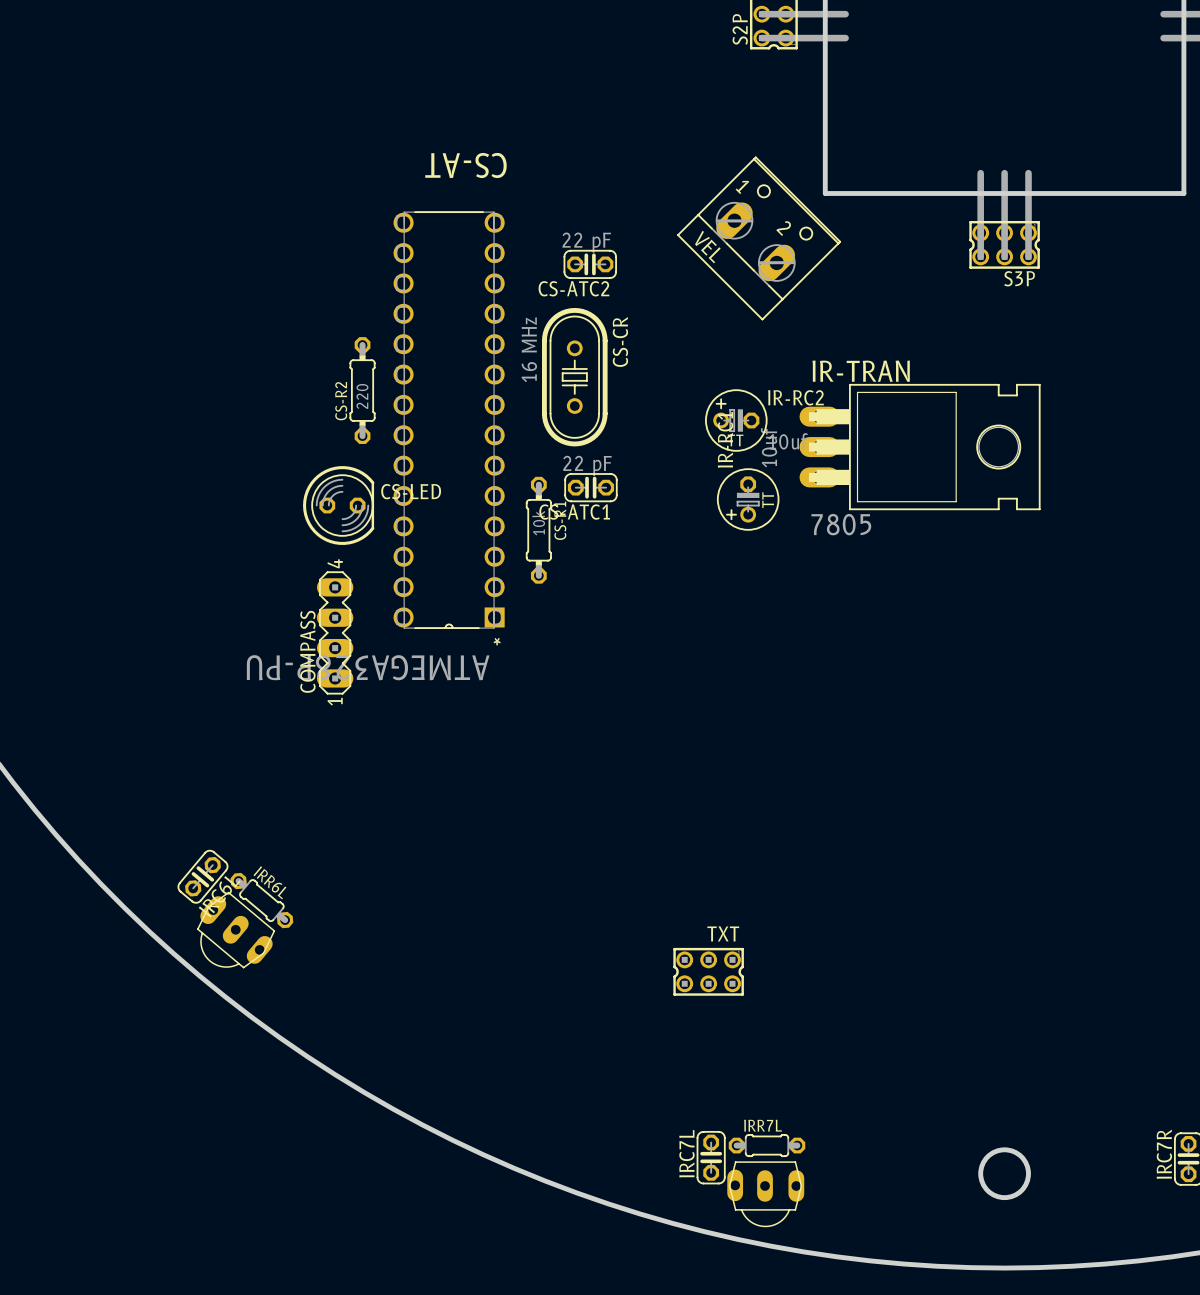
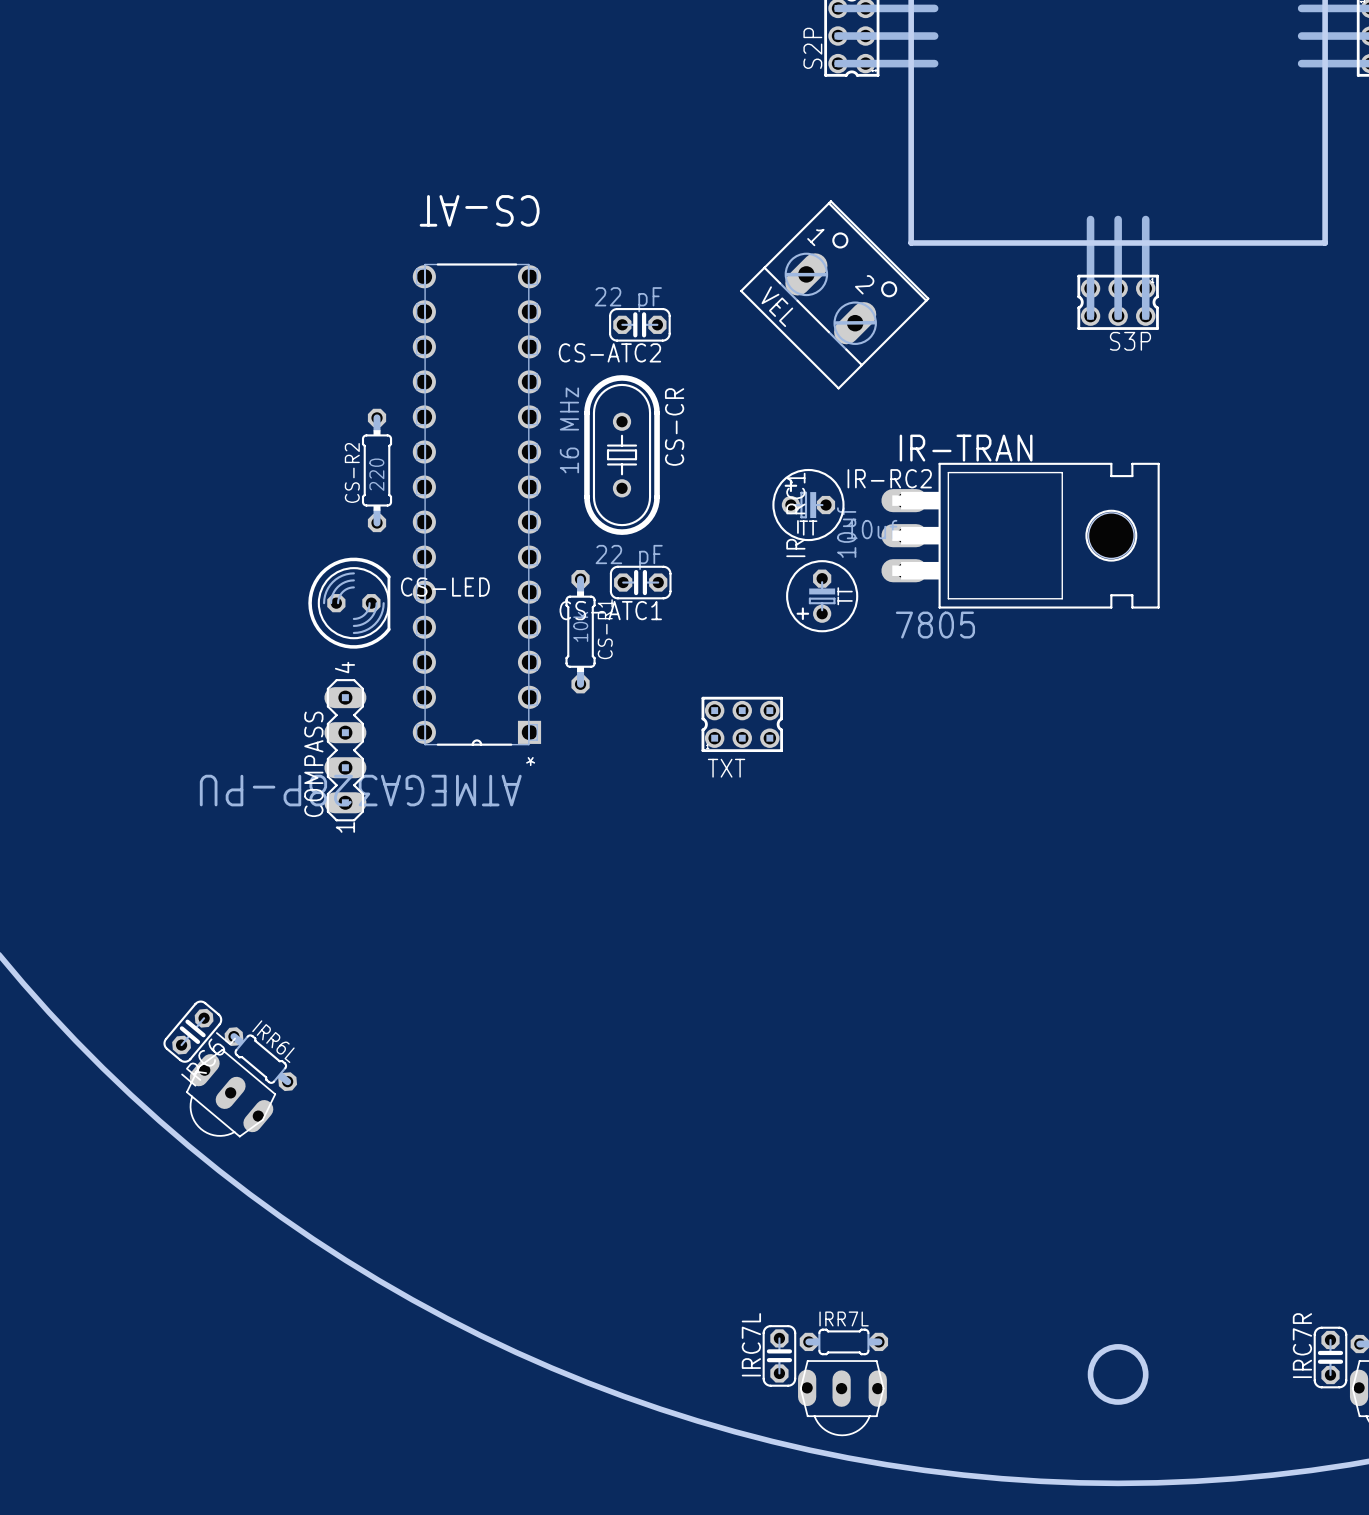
TXT: none -> (742, 724)
TXT: (708, 971) -> none

